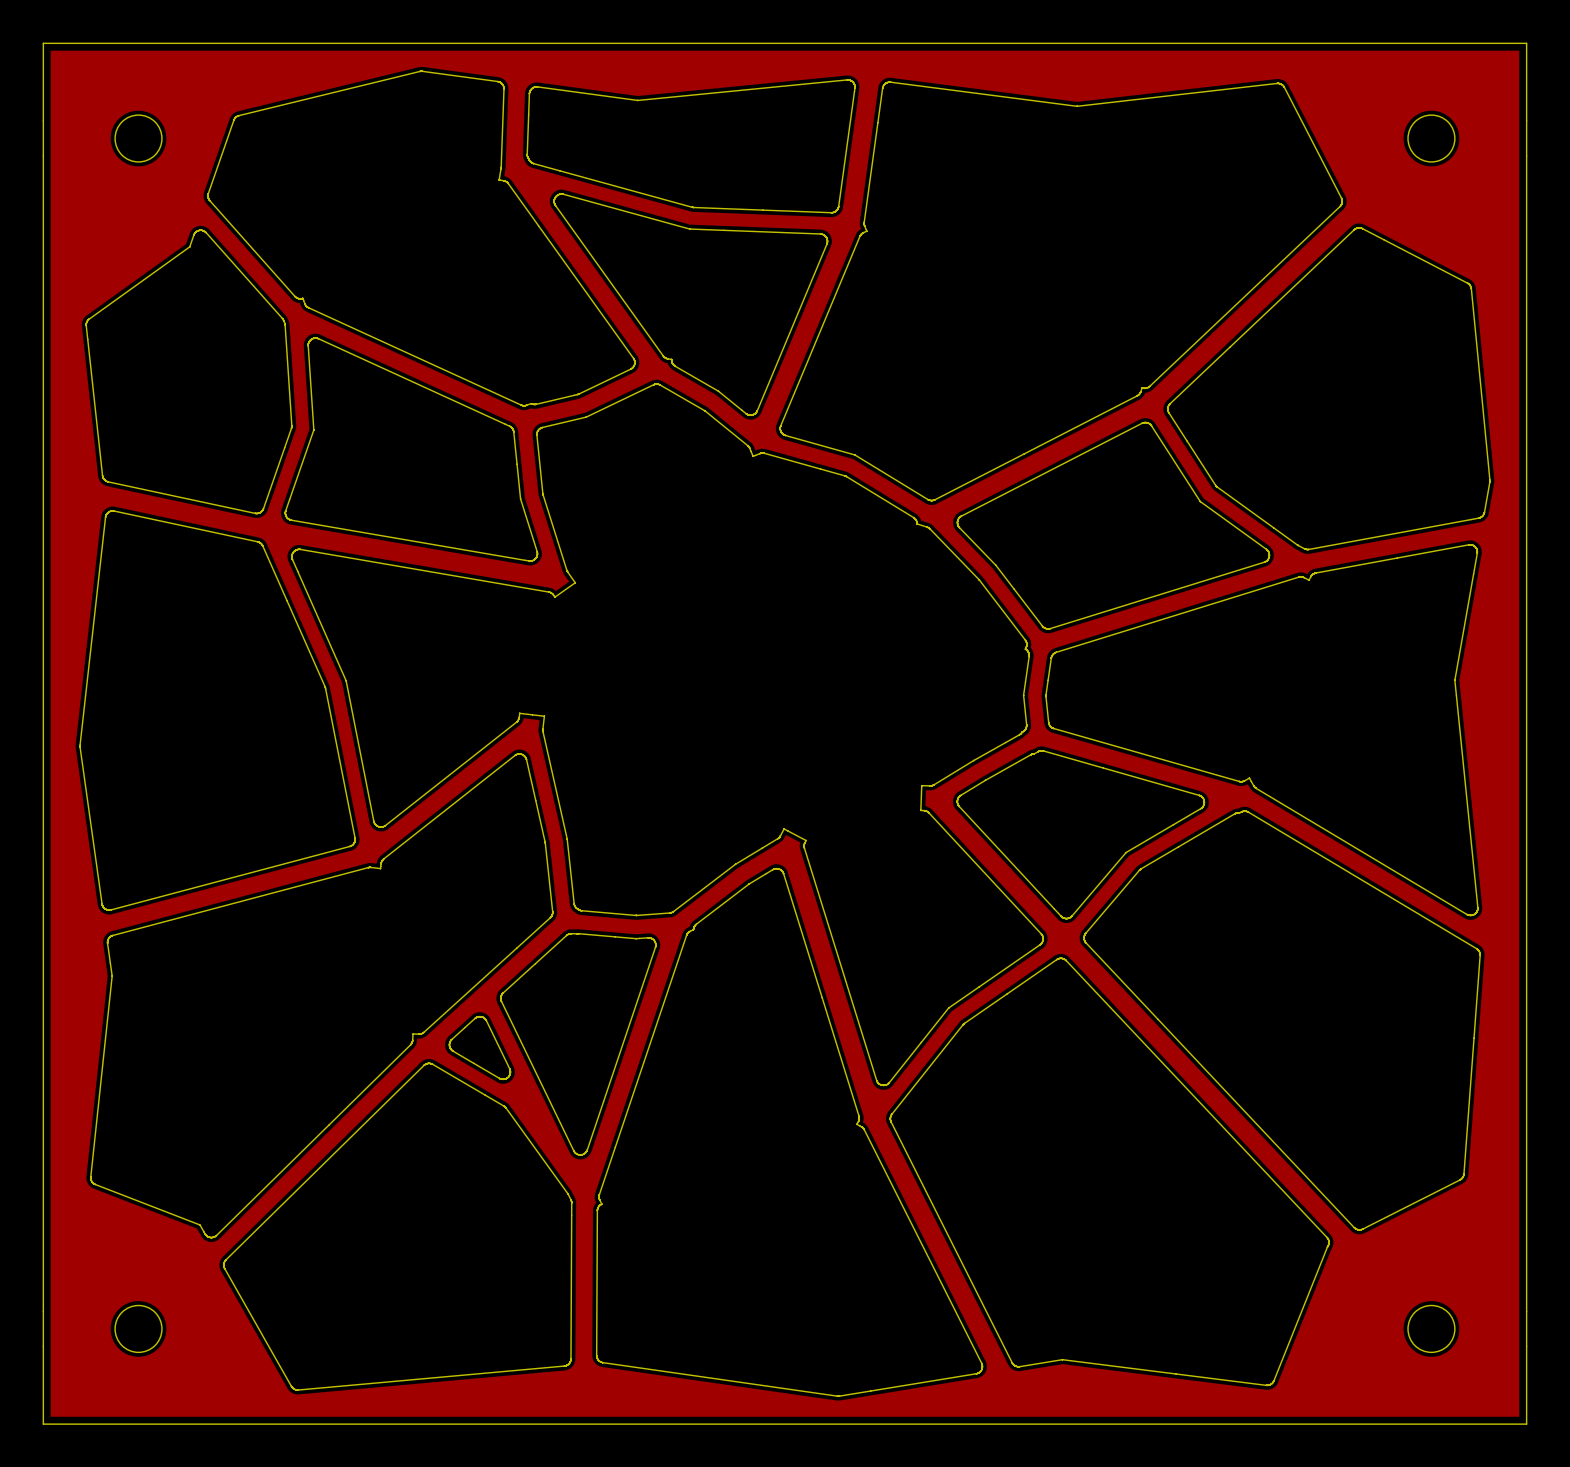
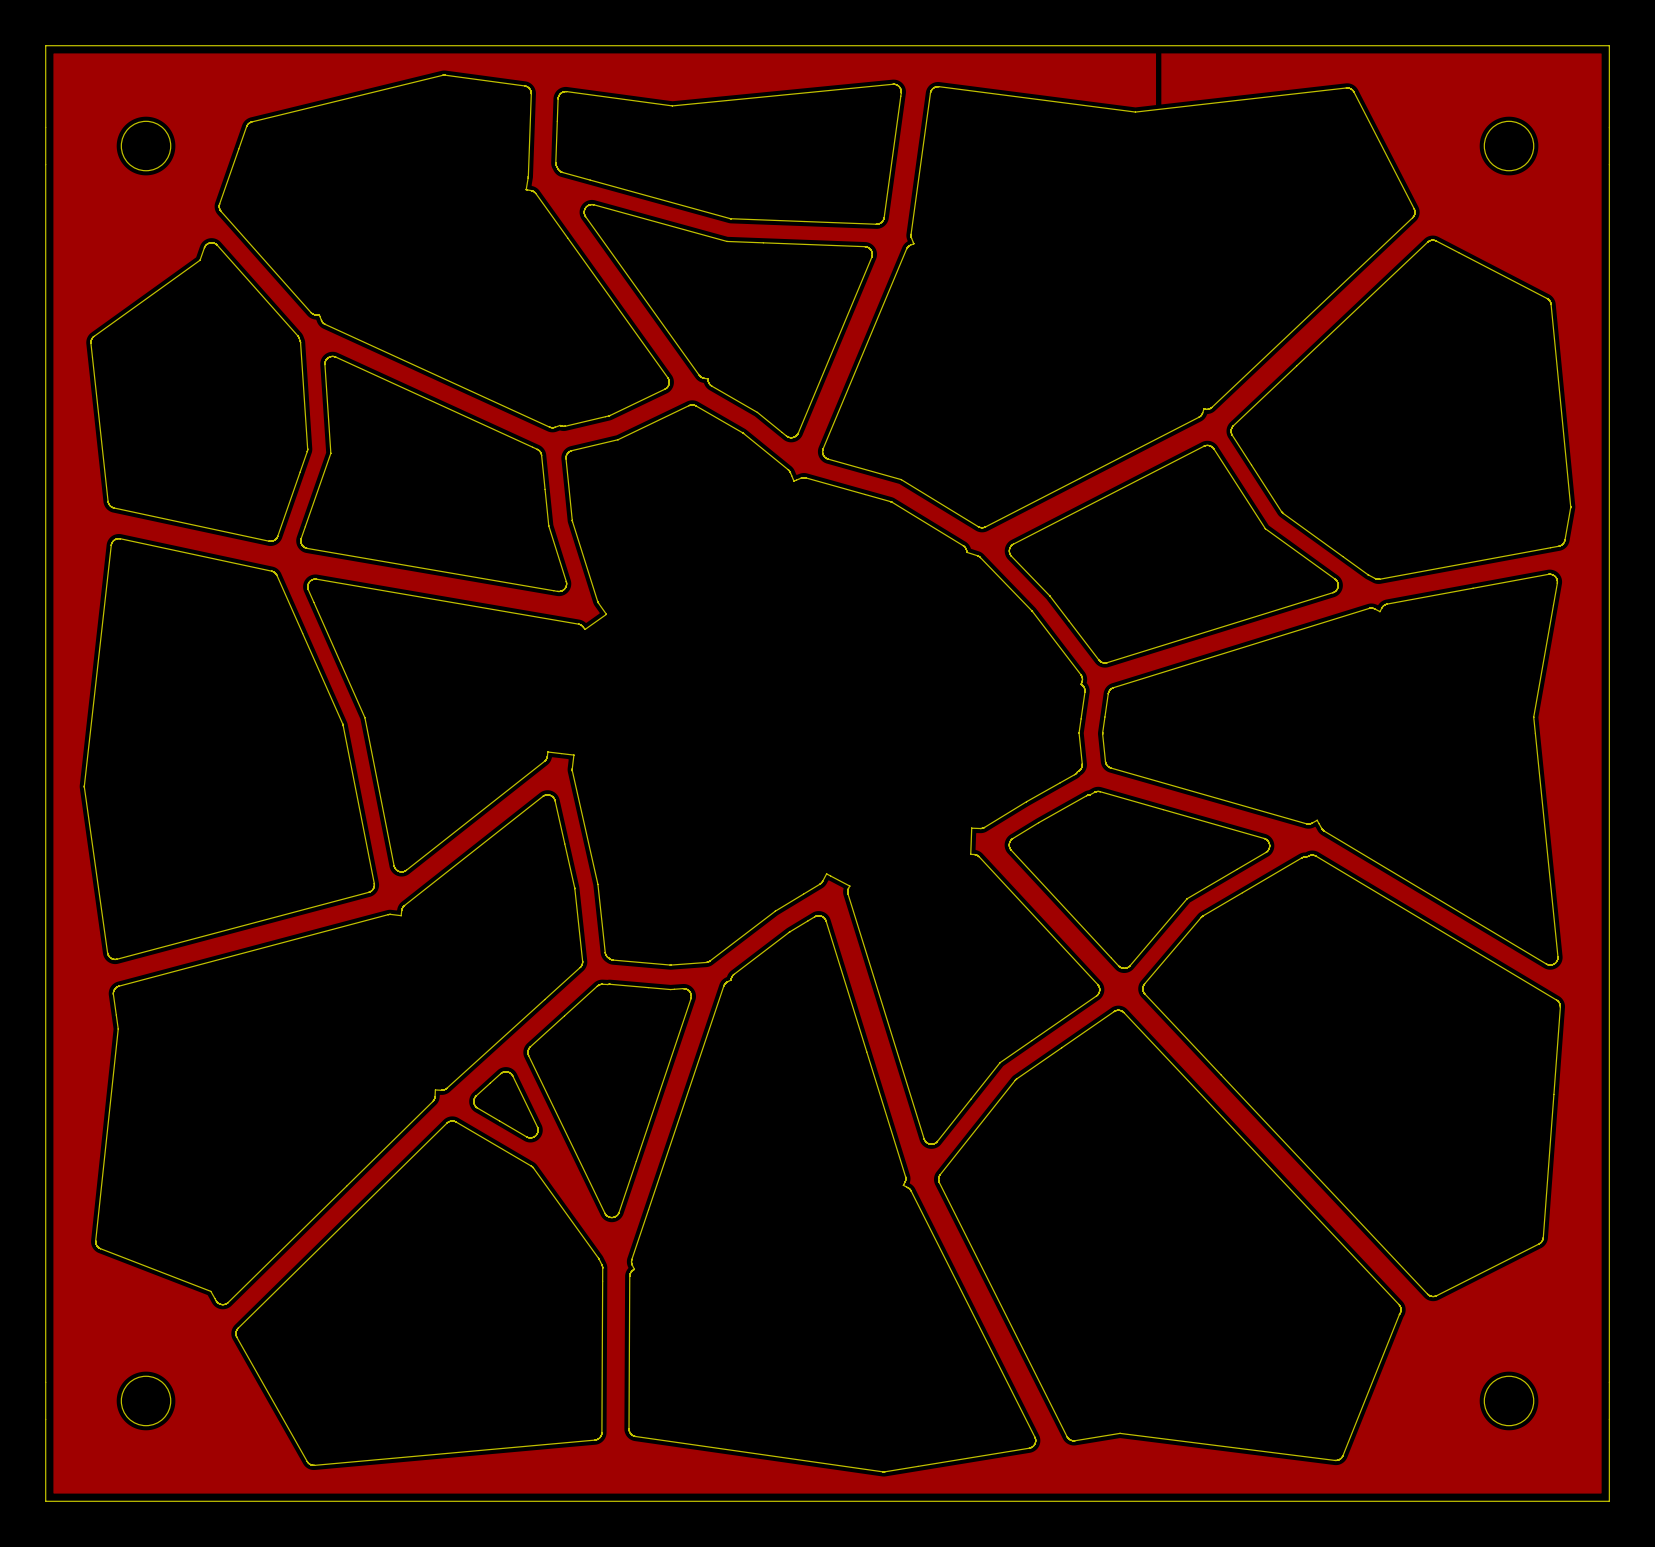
drawing shape: [1096, 50, 1341, 187] -> [1161, 53, 1406, 182]

